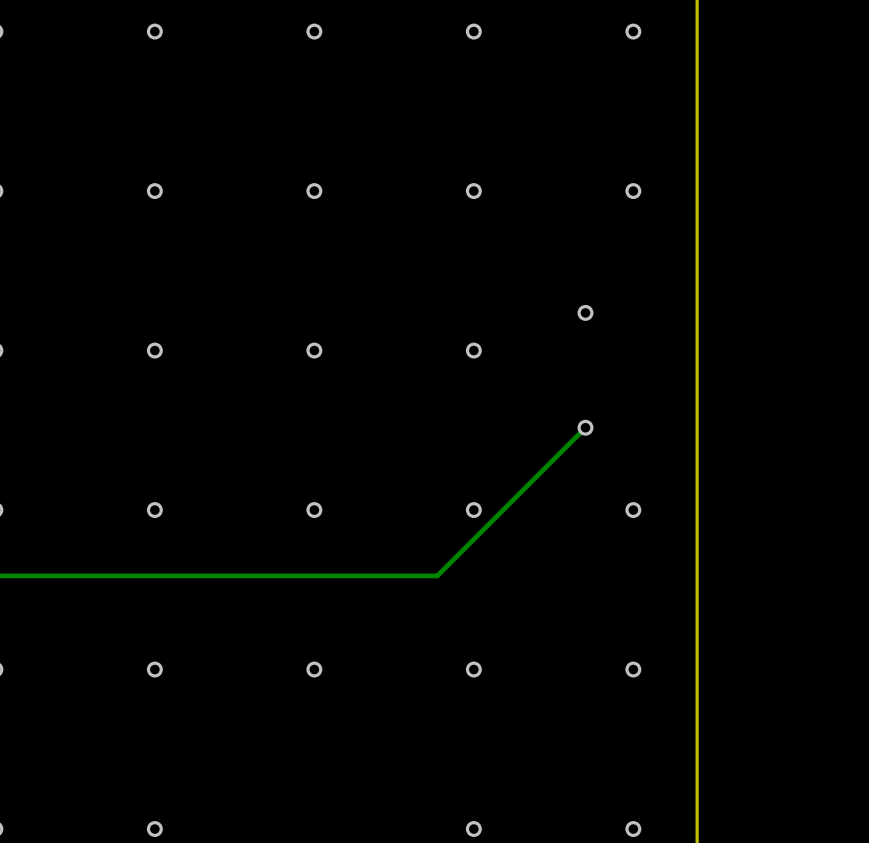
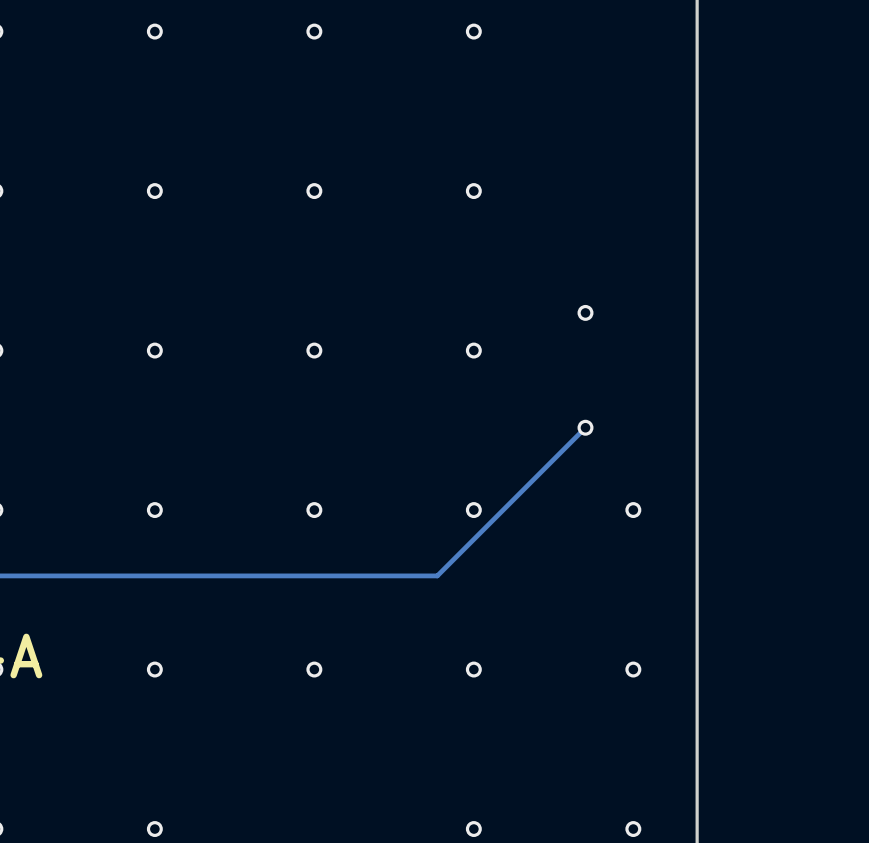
via: (633, 31) -> none
via: (633, 191) -> none

